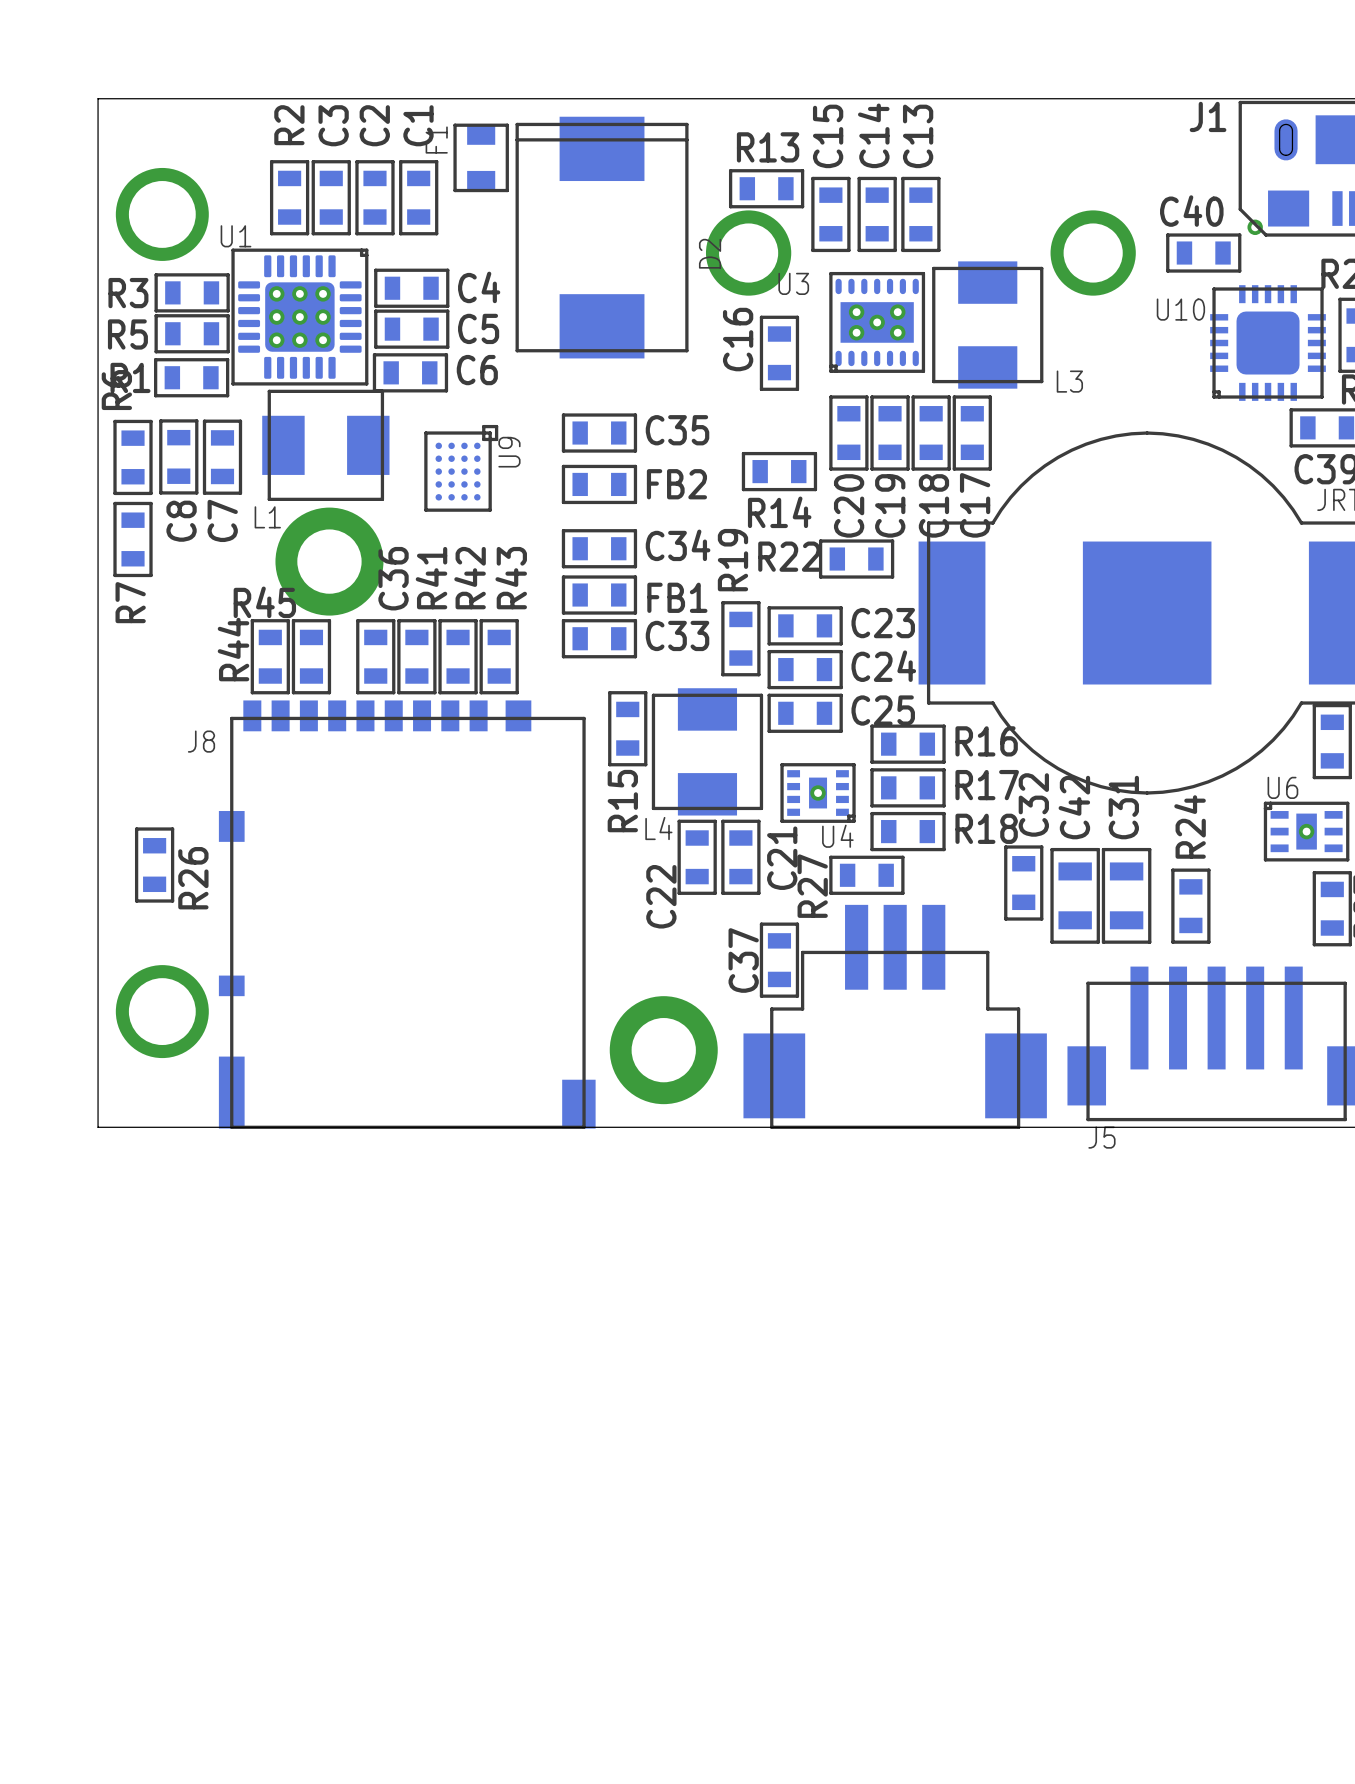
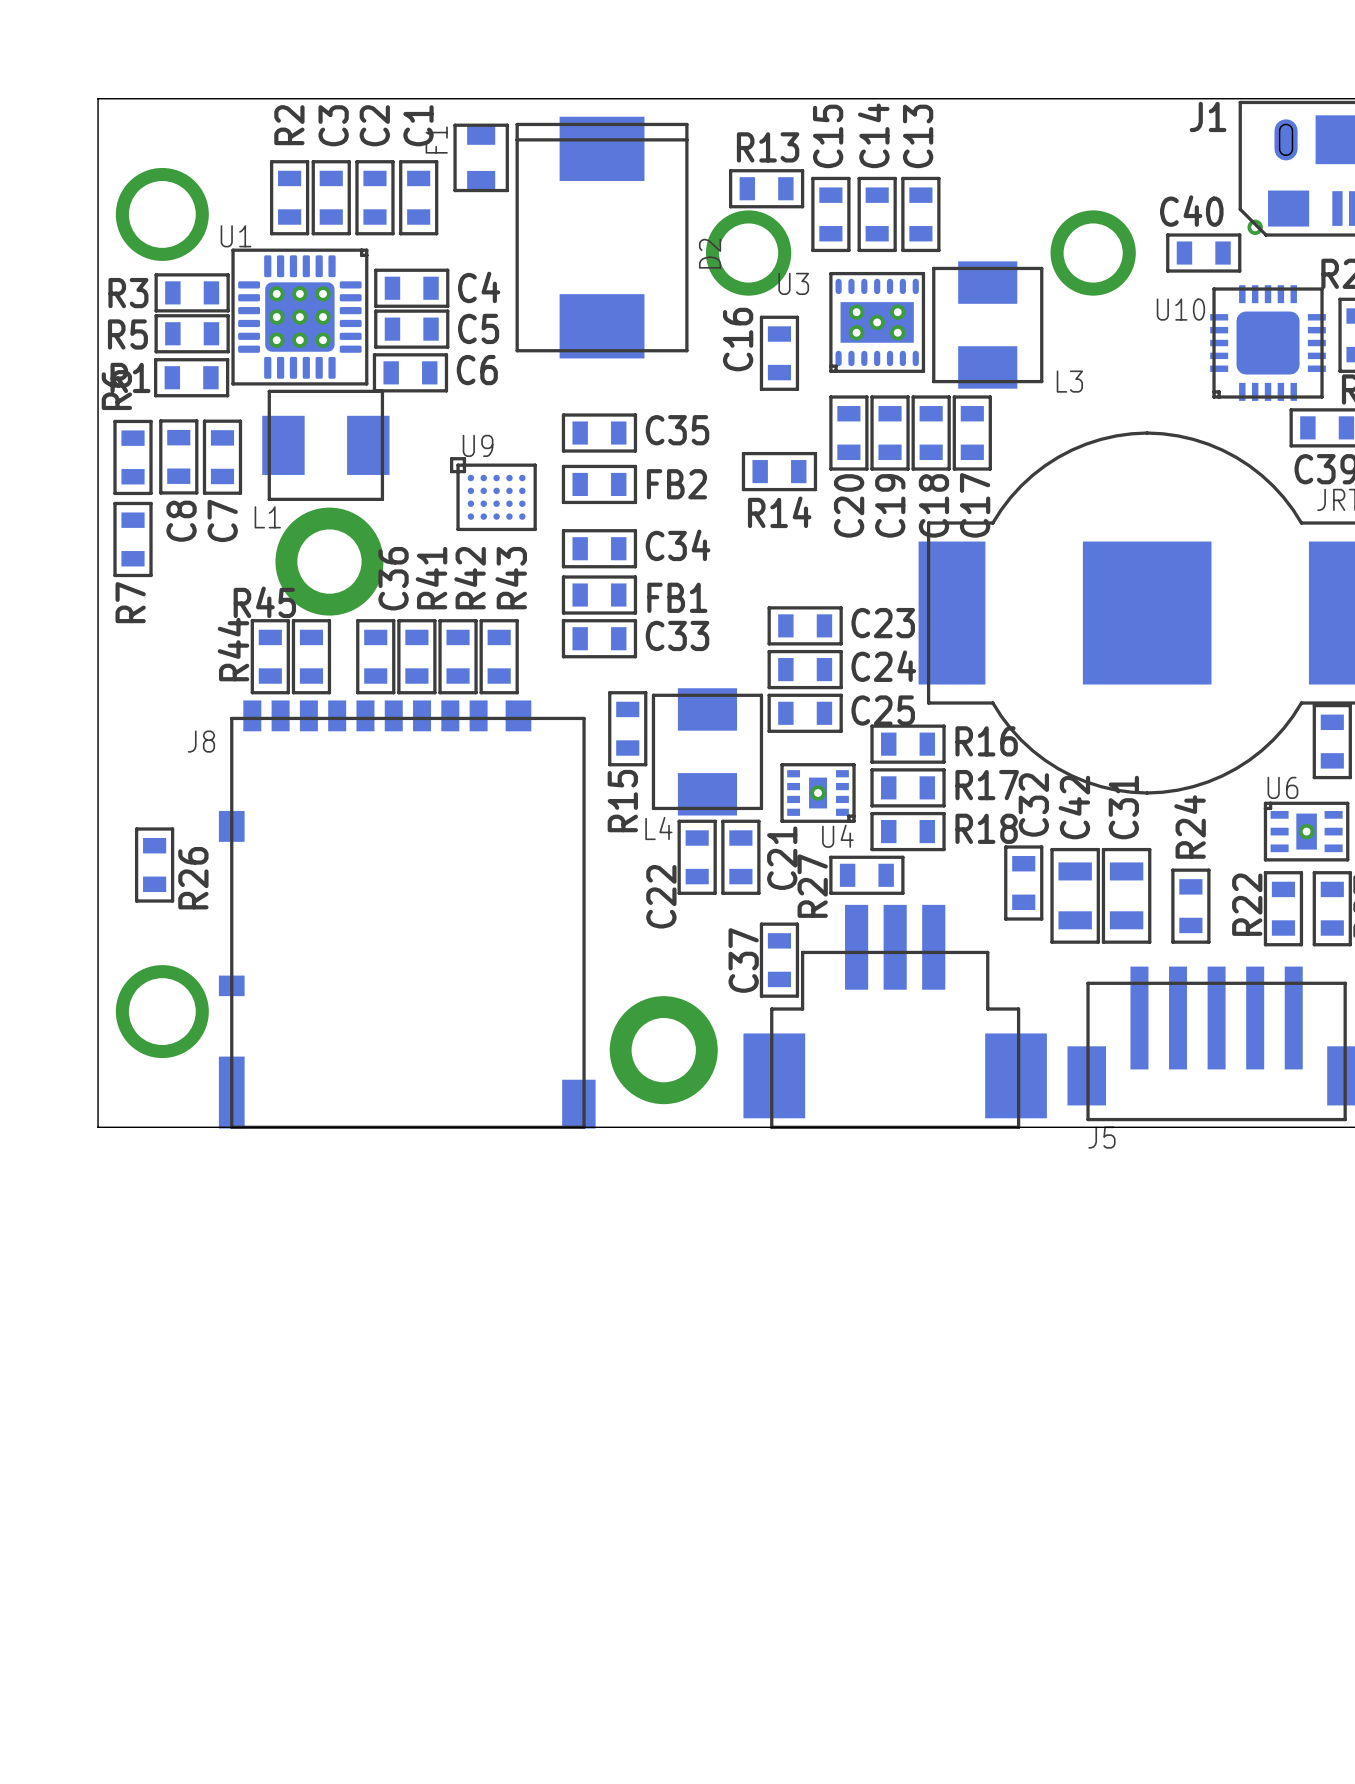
U9 rotation: 0° (461, 468) -> 90° counterclockwise (493, 494)
R22 rotation: 0° (856, 559) -> 90° clockwise (1283, 908)
R22 position: (856, 559) -> (1283, 908)
R19: (740, 638) -> none

